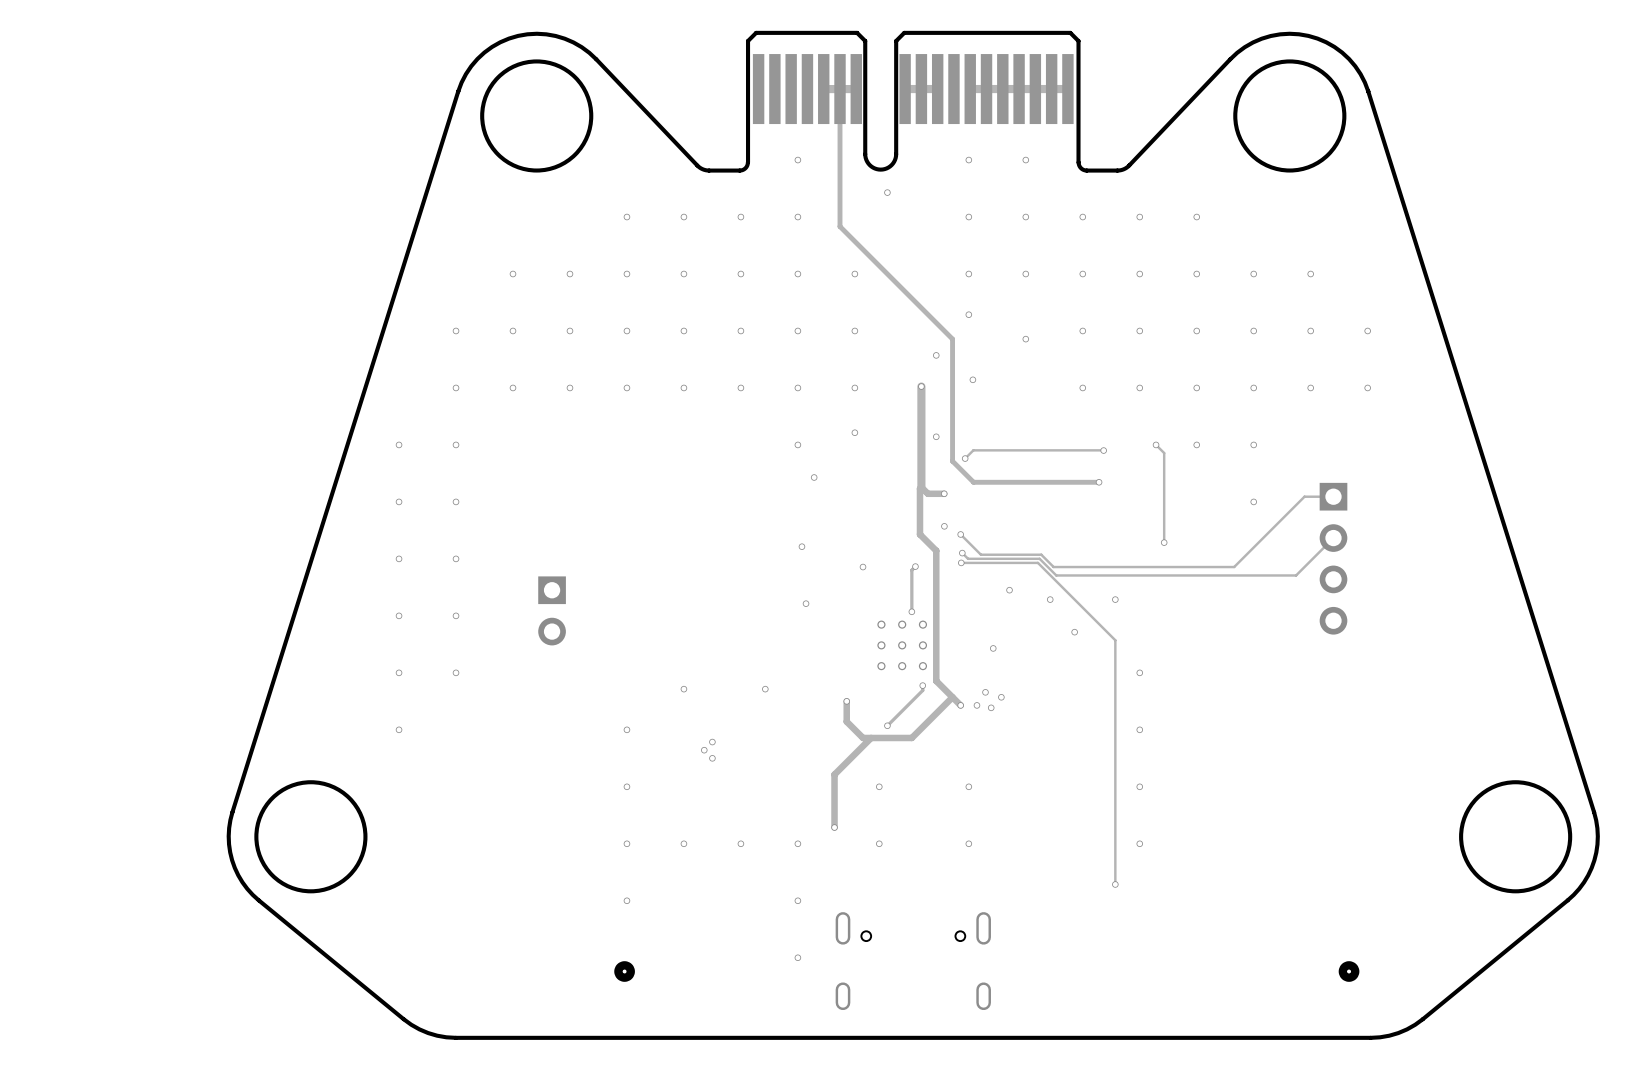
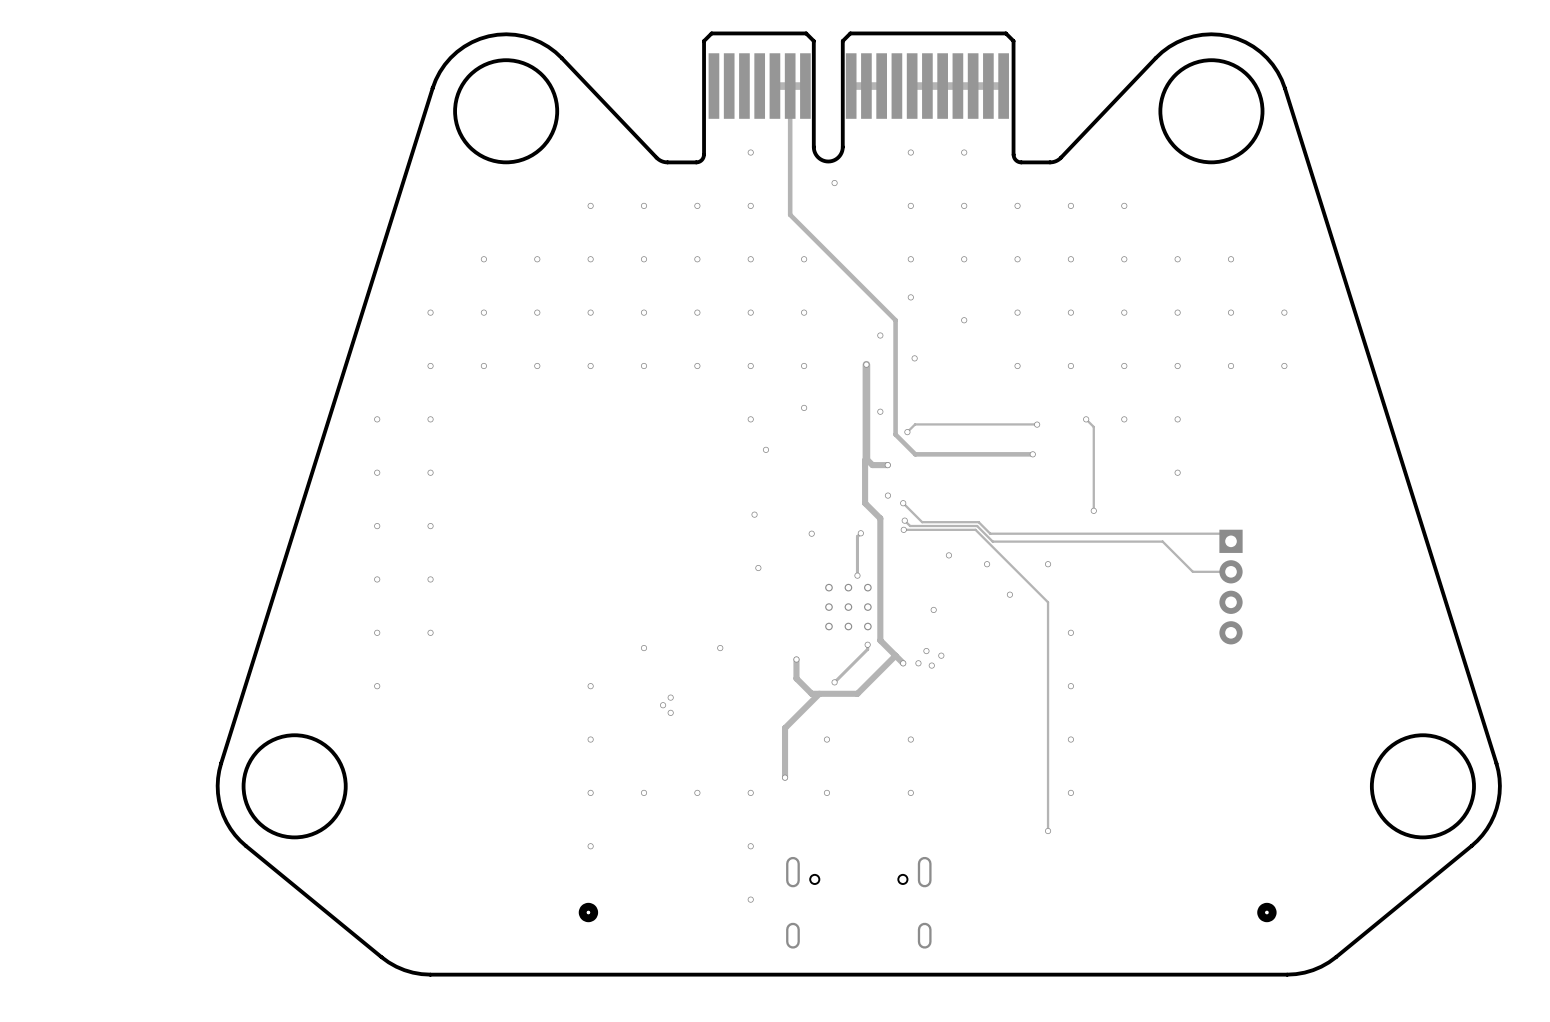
track: (1333, 496) (1304, 496) (1234, 567) -> (1231, 541) (1223, 533) (1159, 533)
track: (1333, 538) (1296, 575) (1237, 575) -> (1231, 571) (1192, 571) (1162, 541)
part: (1333, 558) -> none
part: (552, 610) -> none
part: none -> (1231, 587)

